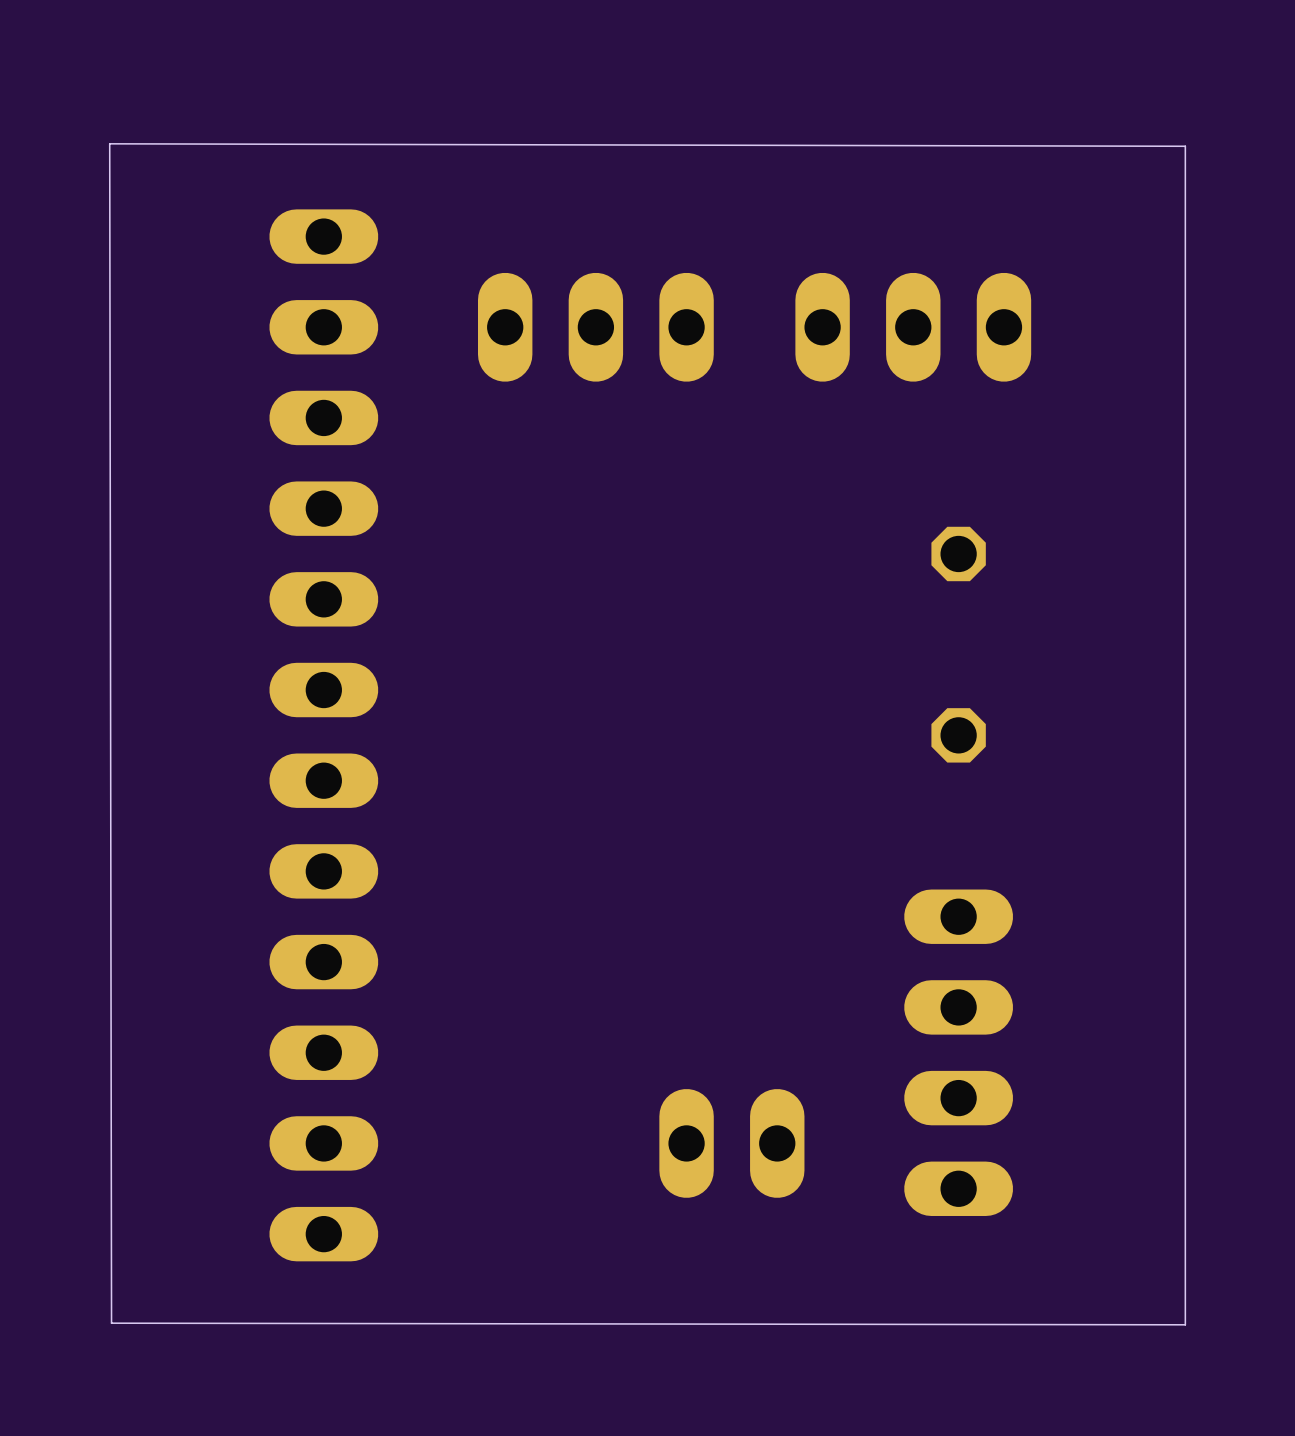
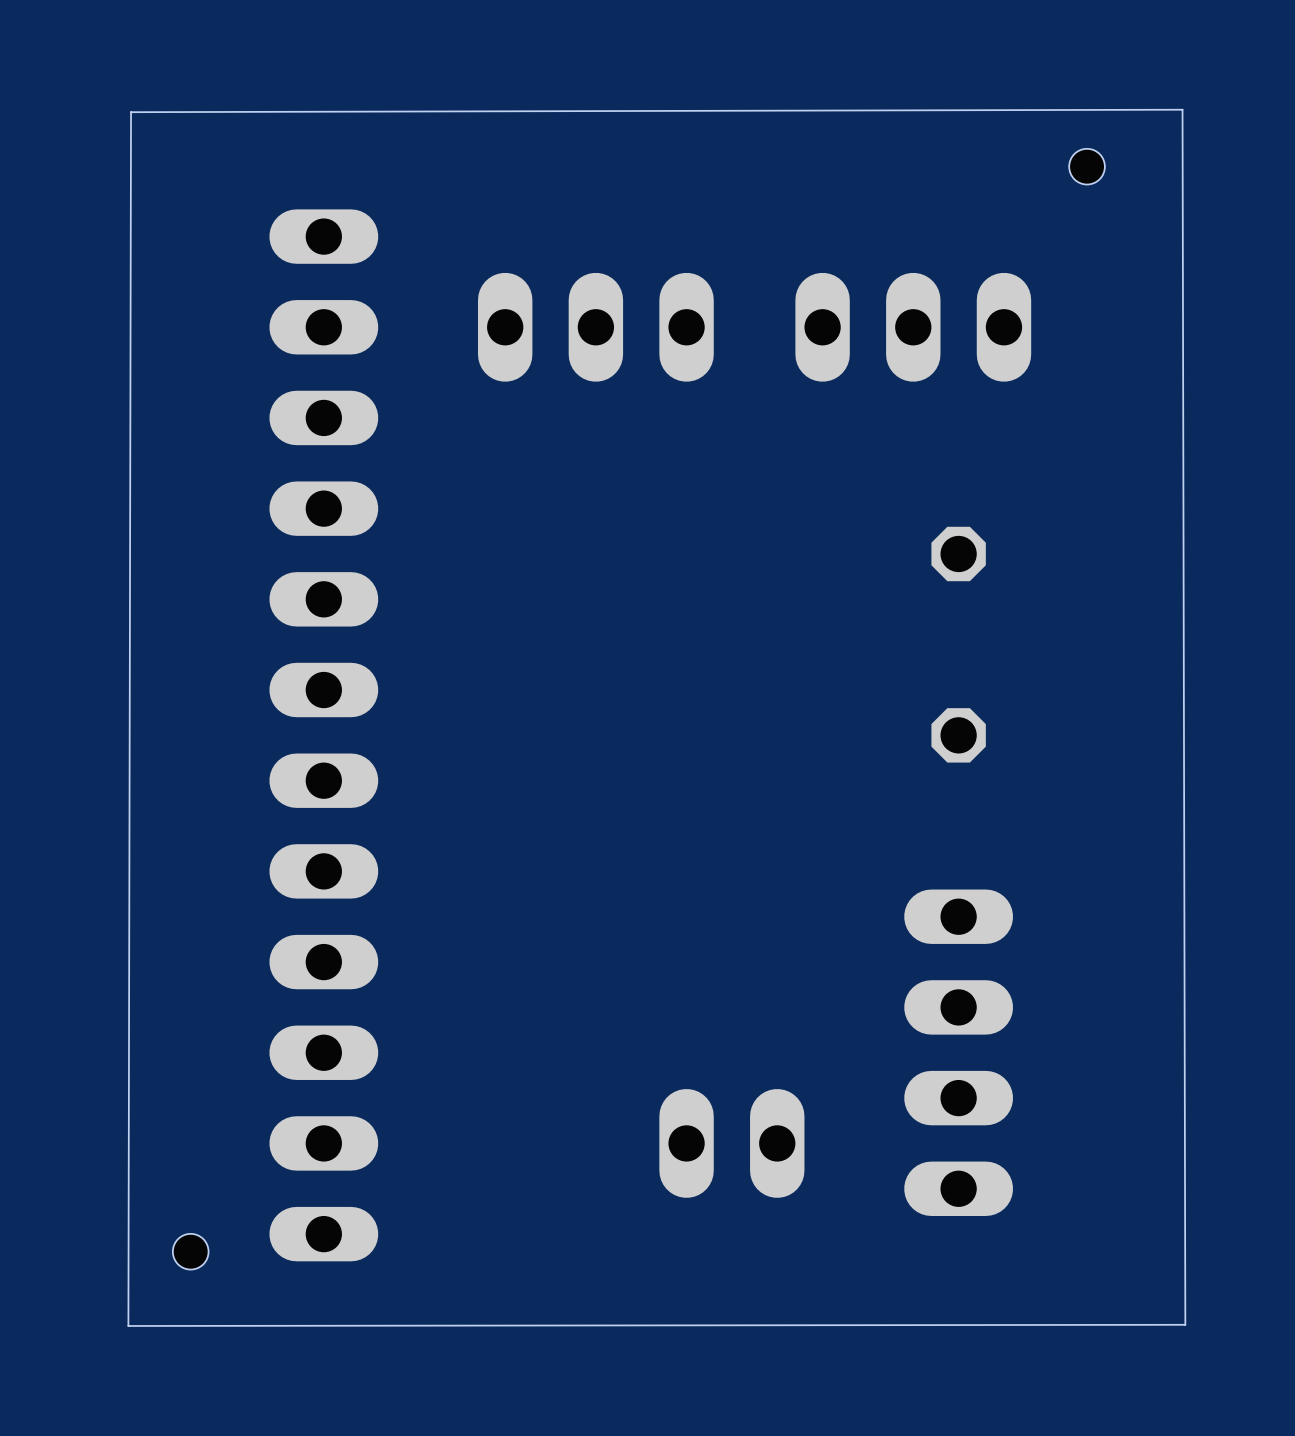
board edge: (109, 143) (111, 1323) (1185, 1324) (1185, 146) (109, 143) -> (1182, 109) (1185, 1324) (128, 1325) (131, 112) (1182, 109)
hole: none -> (1087, 166)
hole: none -> (190, 1251)

